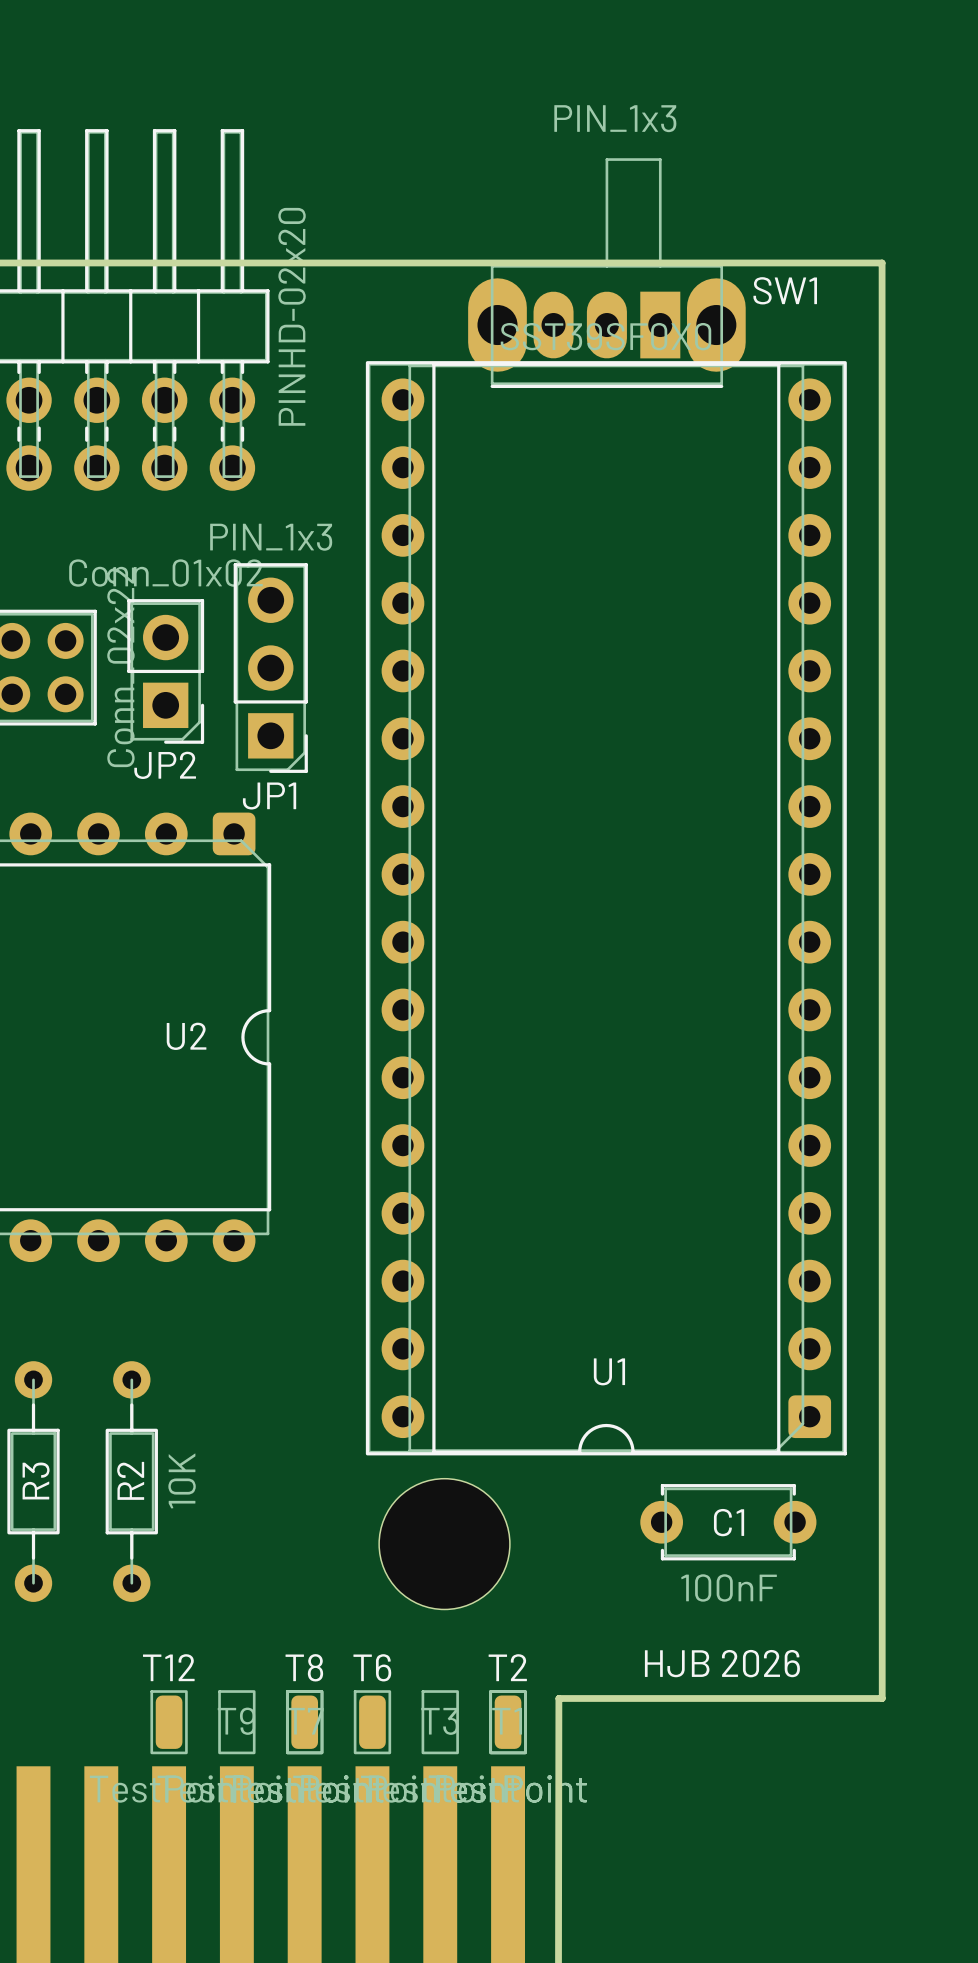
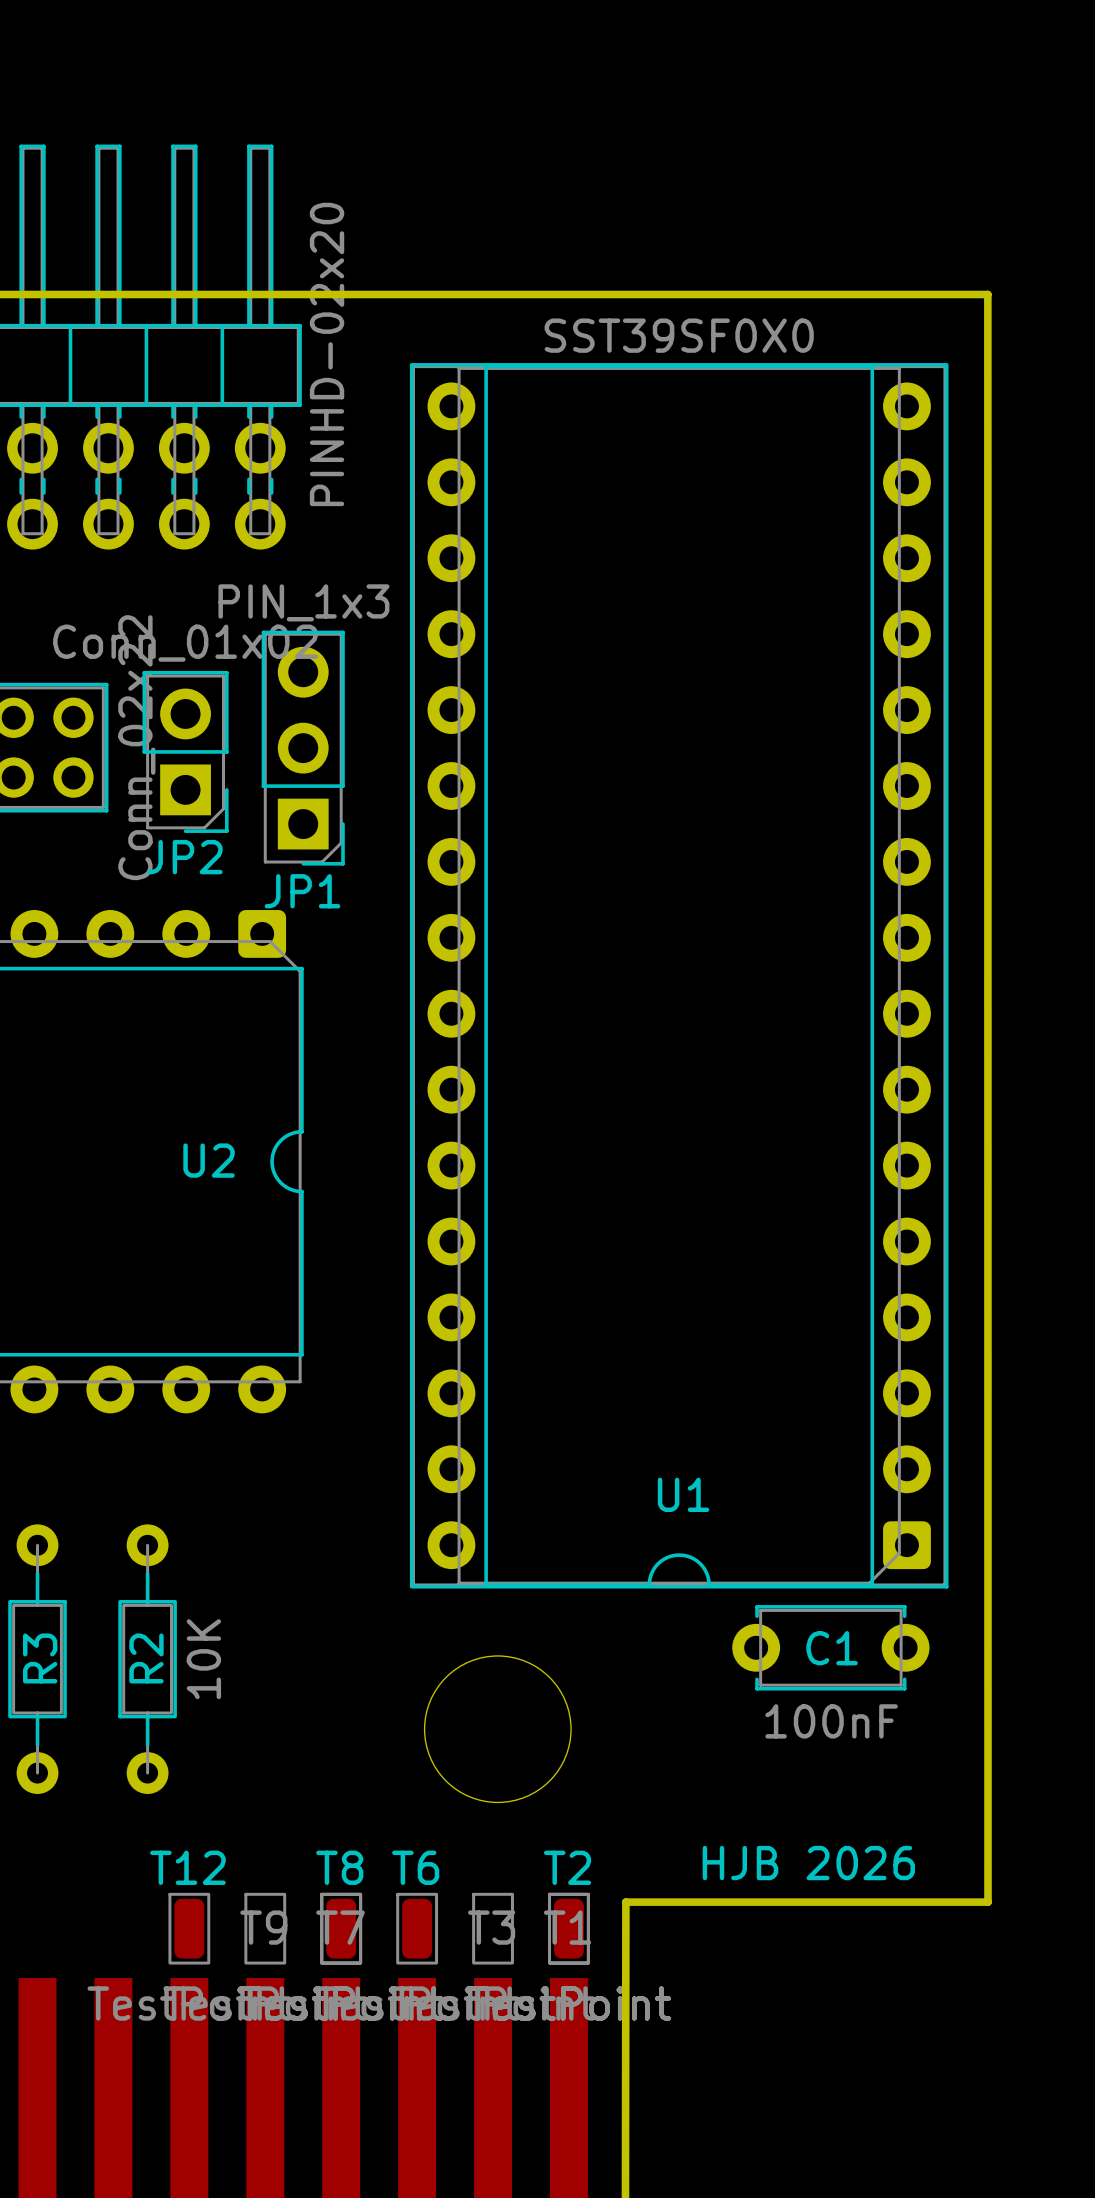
SW1: PIN_1x3 (606, 273) -> none
U1 position: (606, 908) -> (679, 975)
C1 position: (728, 1522) -> (830, 1647)

